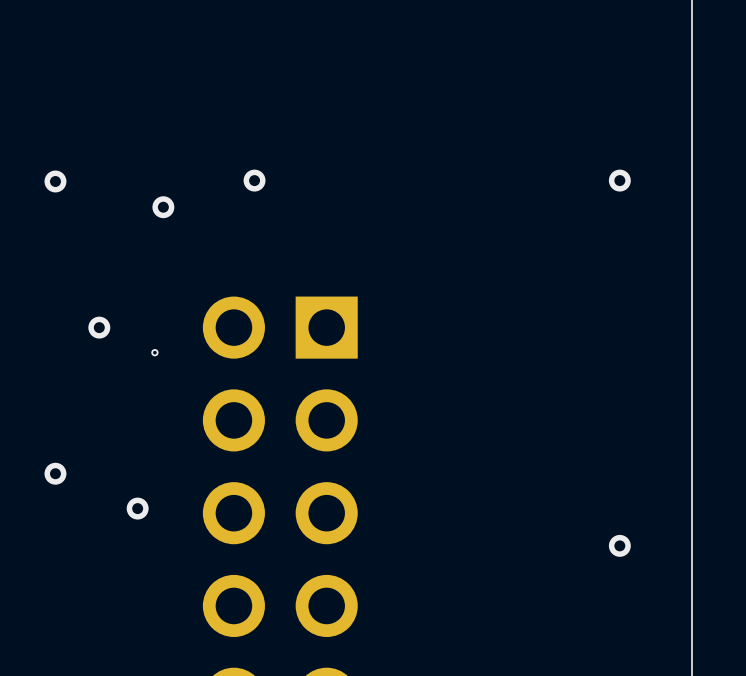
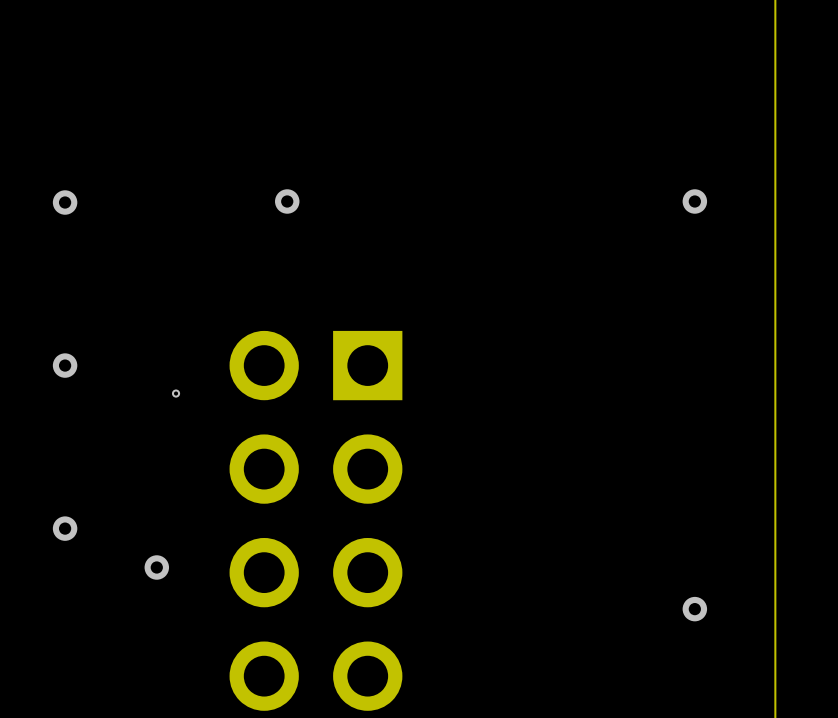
via: (163, 207) -> none
via position: (99, 327) -> (65, 365)

